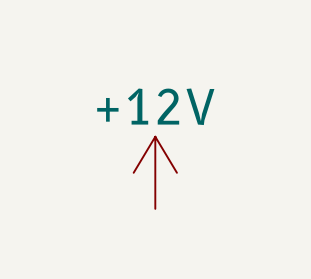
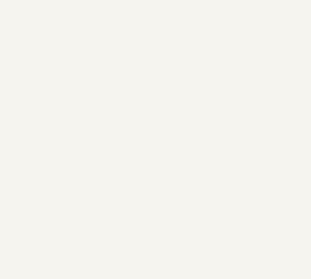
power symbol: +12V (155, 172) -> none

